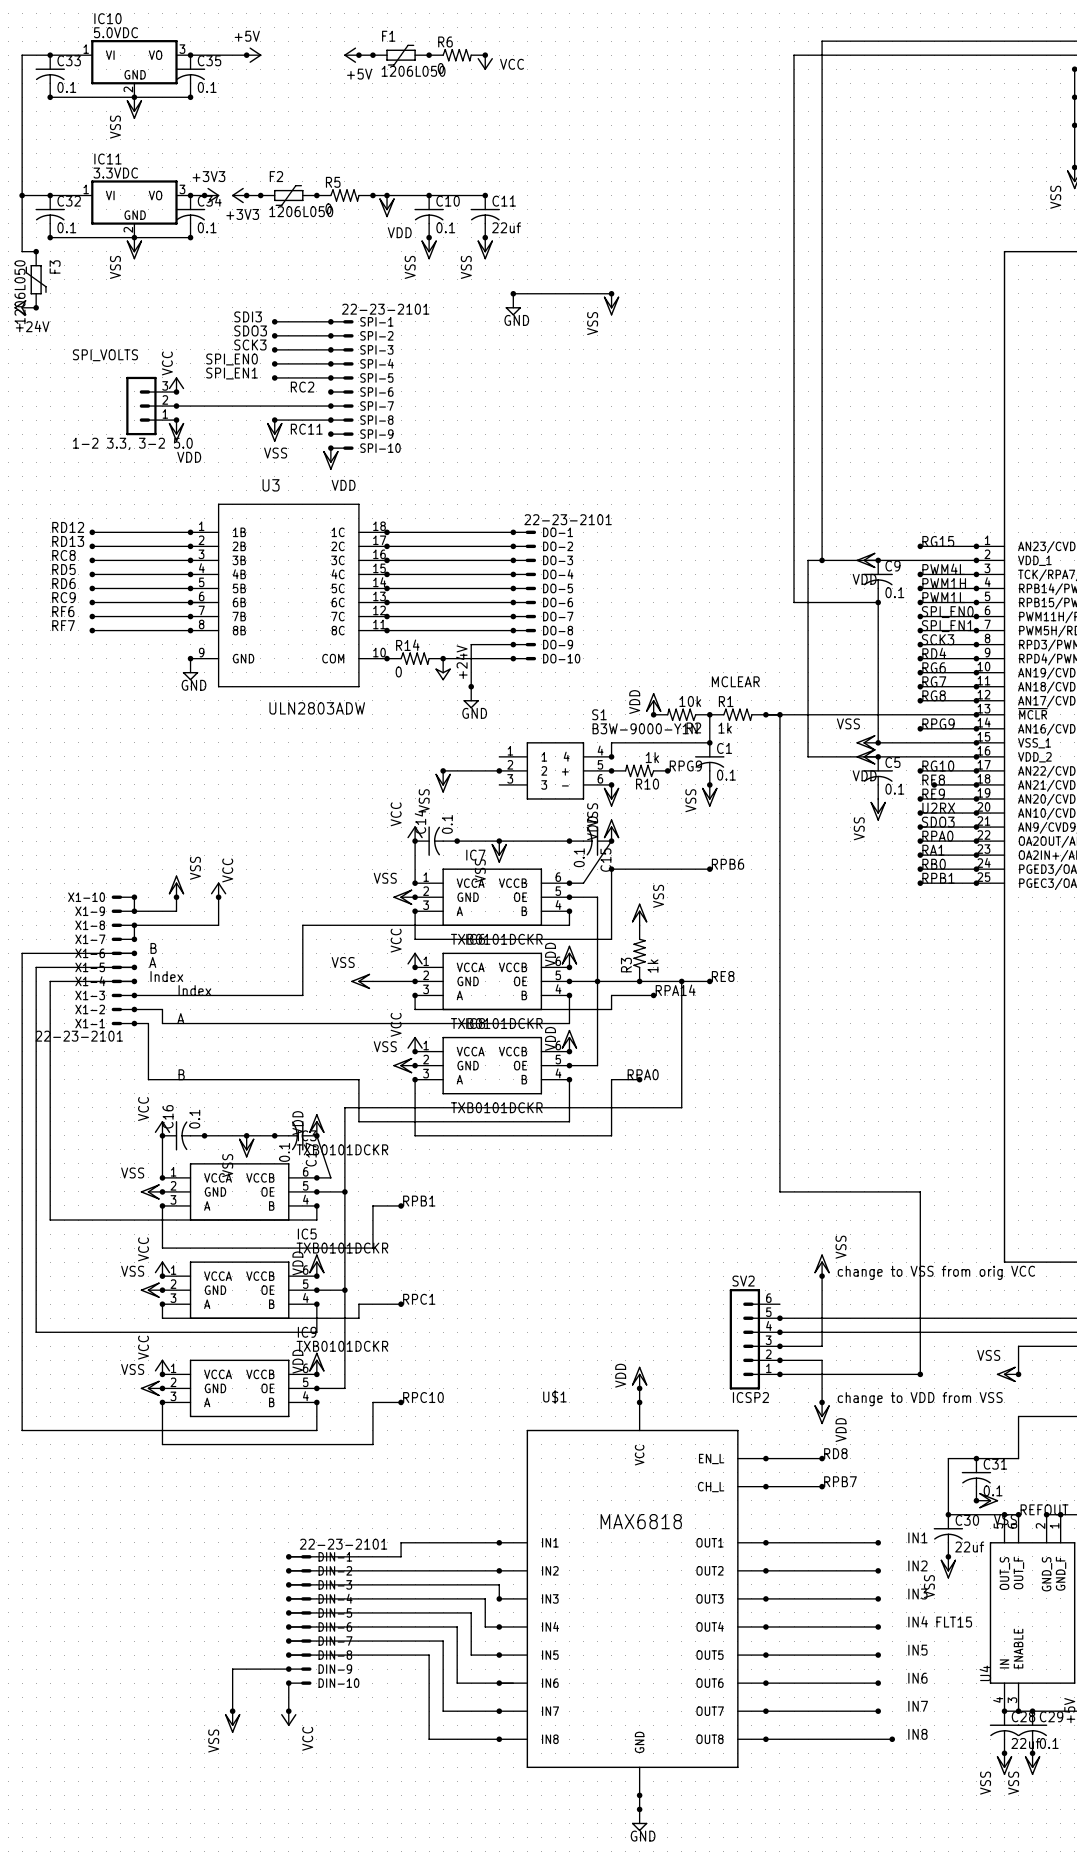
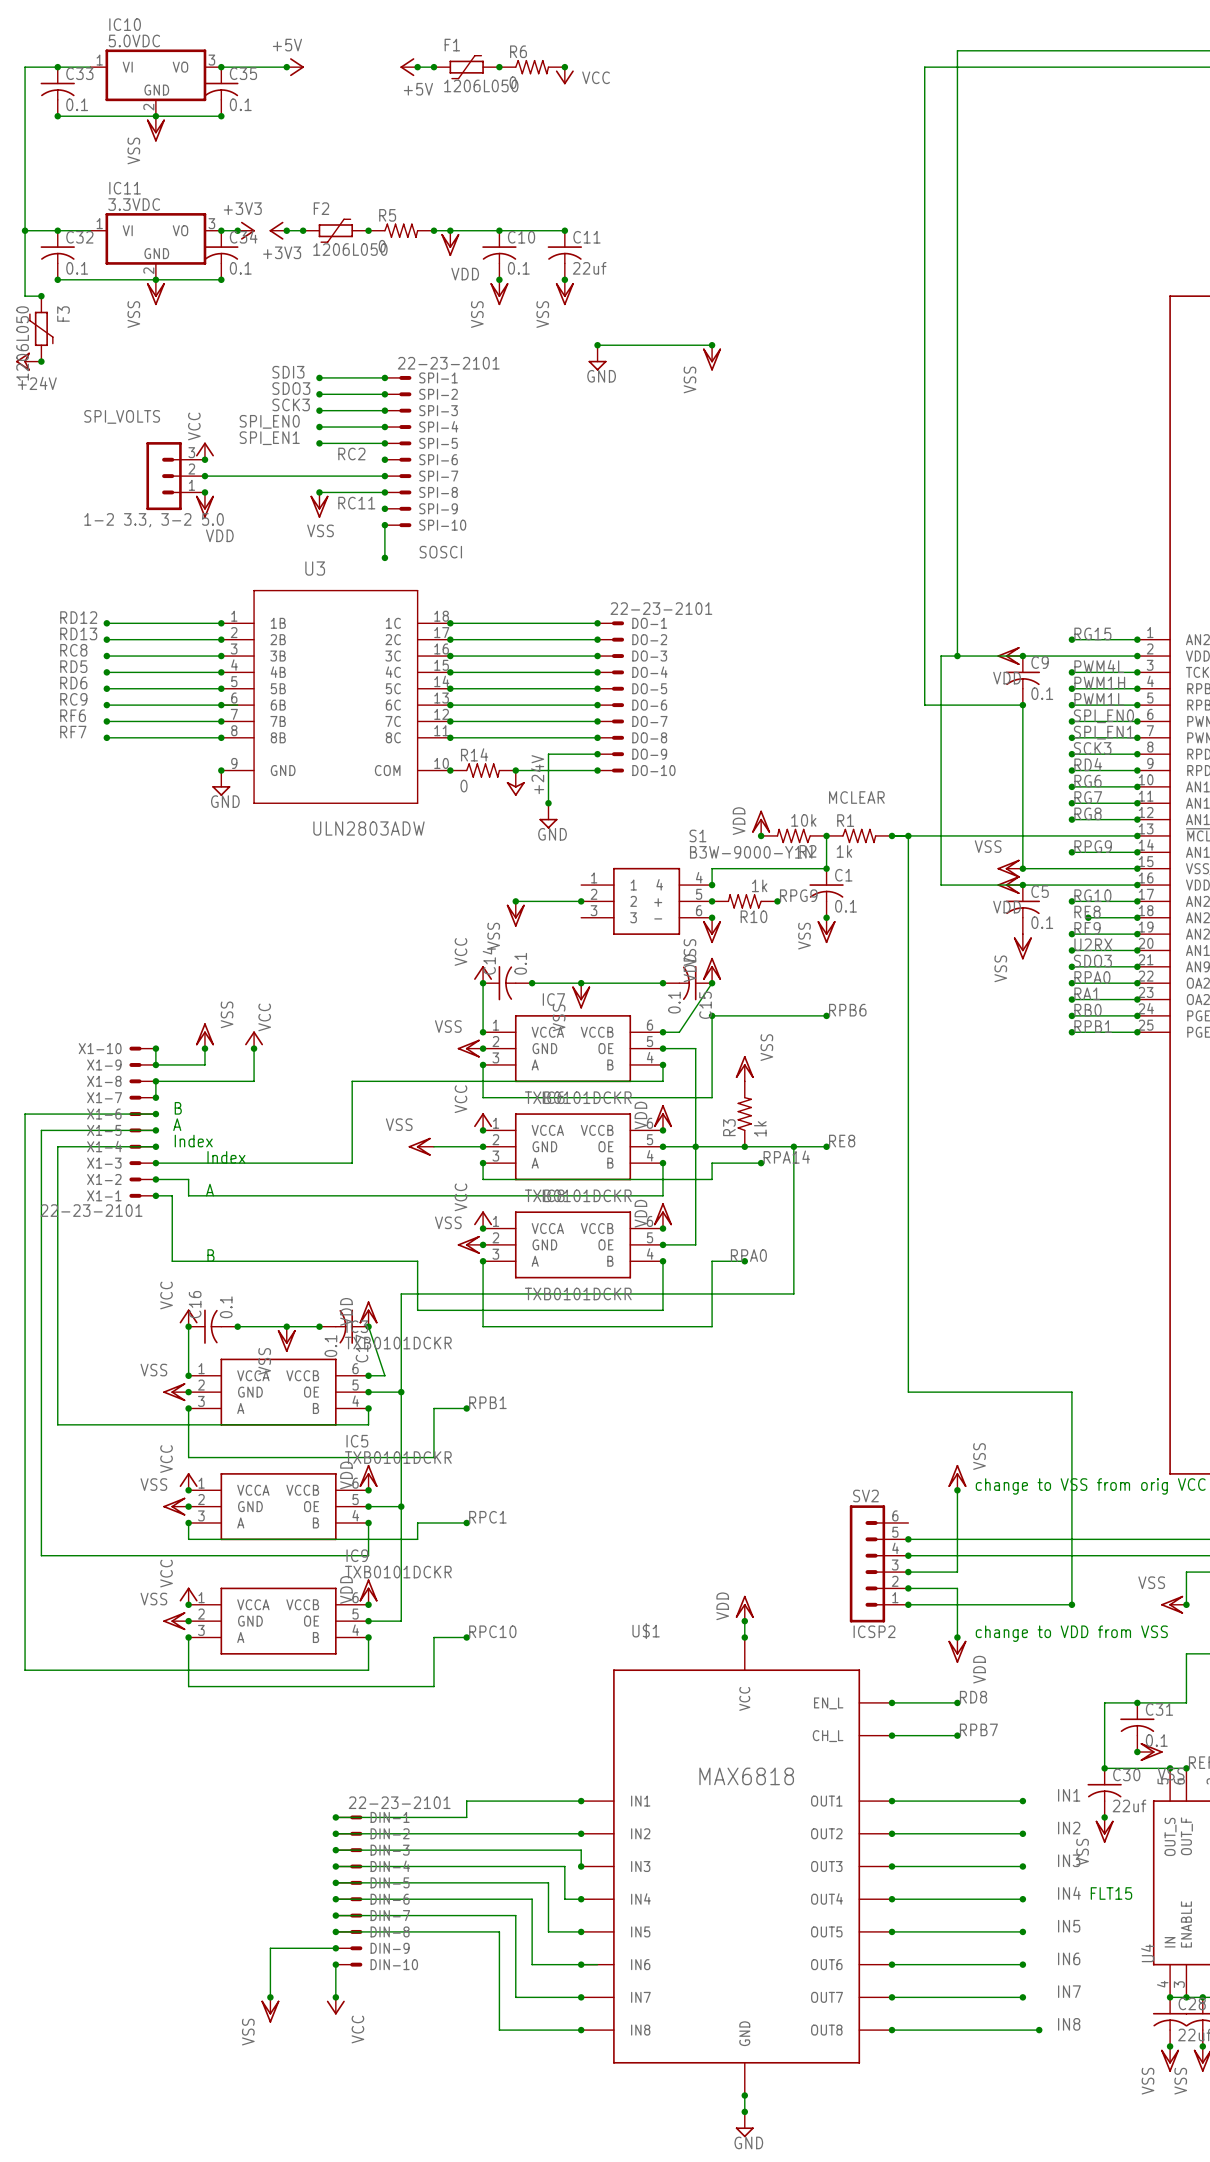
power symbol: VDD (330, 459) -> none
label: none -> SOSCI (440, 552)
junction: none -> (384, 557)

